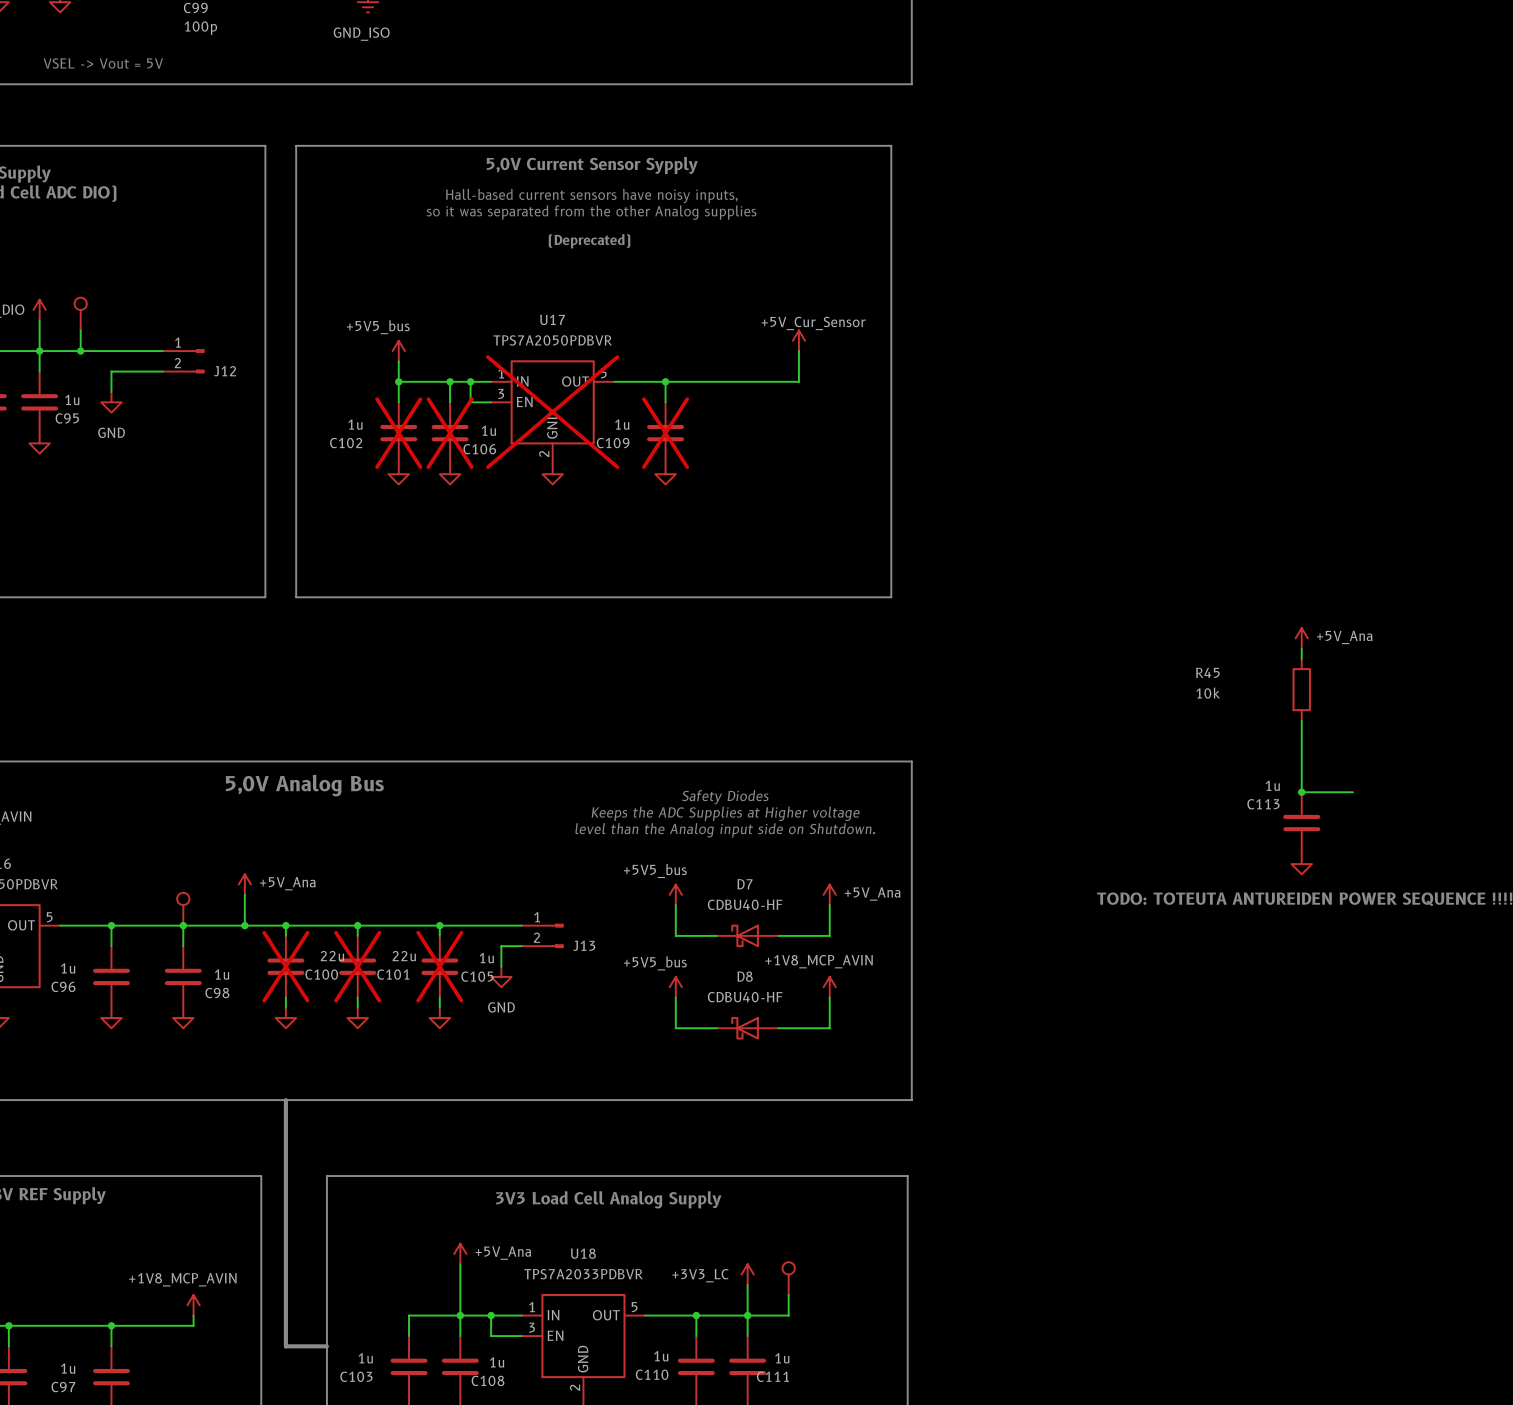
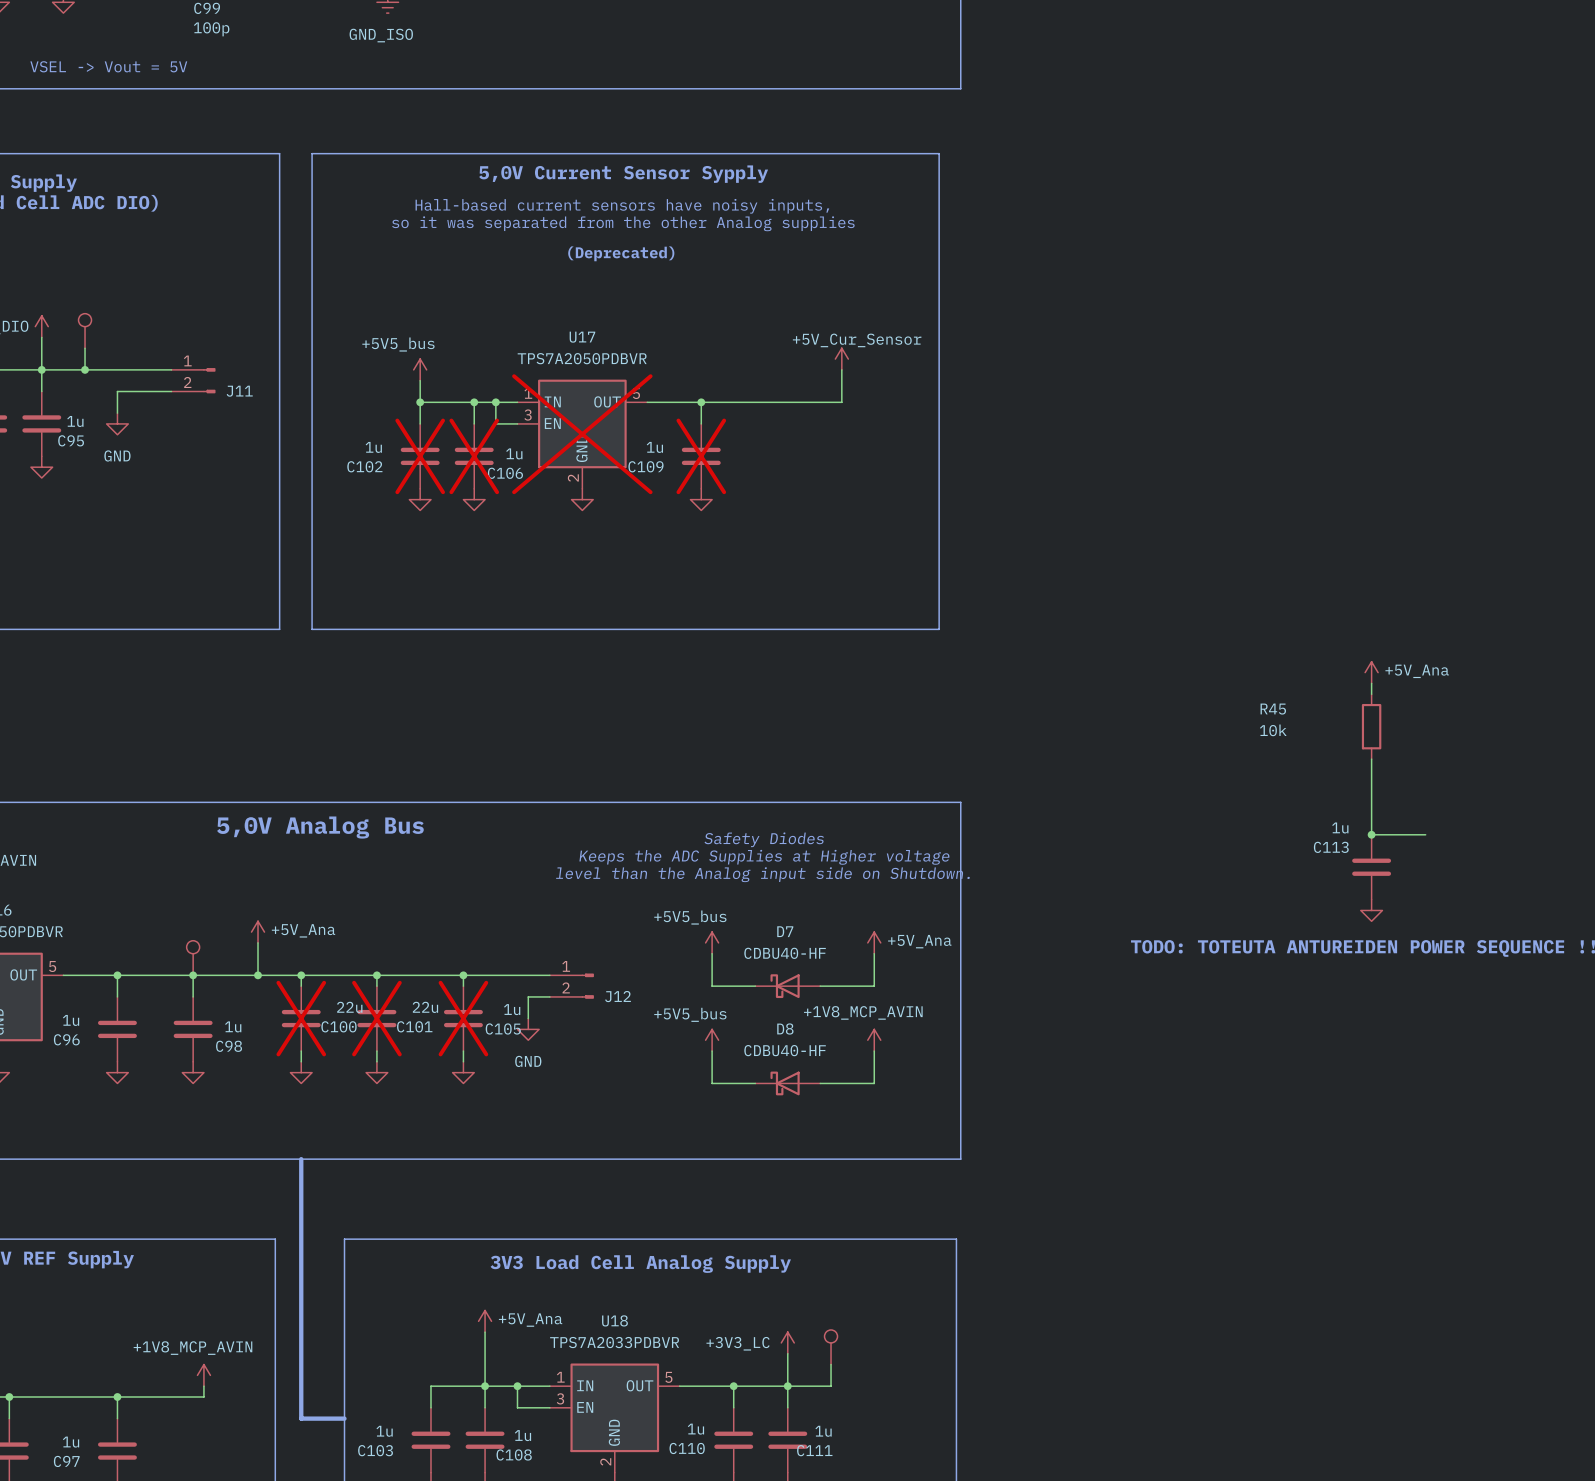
J12 name: J12 (225, 371) -> J11 (239, 391)
J13 name: J13 (584, 945) -> J12 (618, 996)

